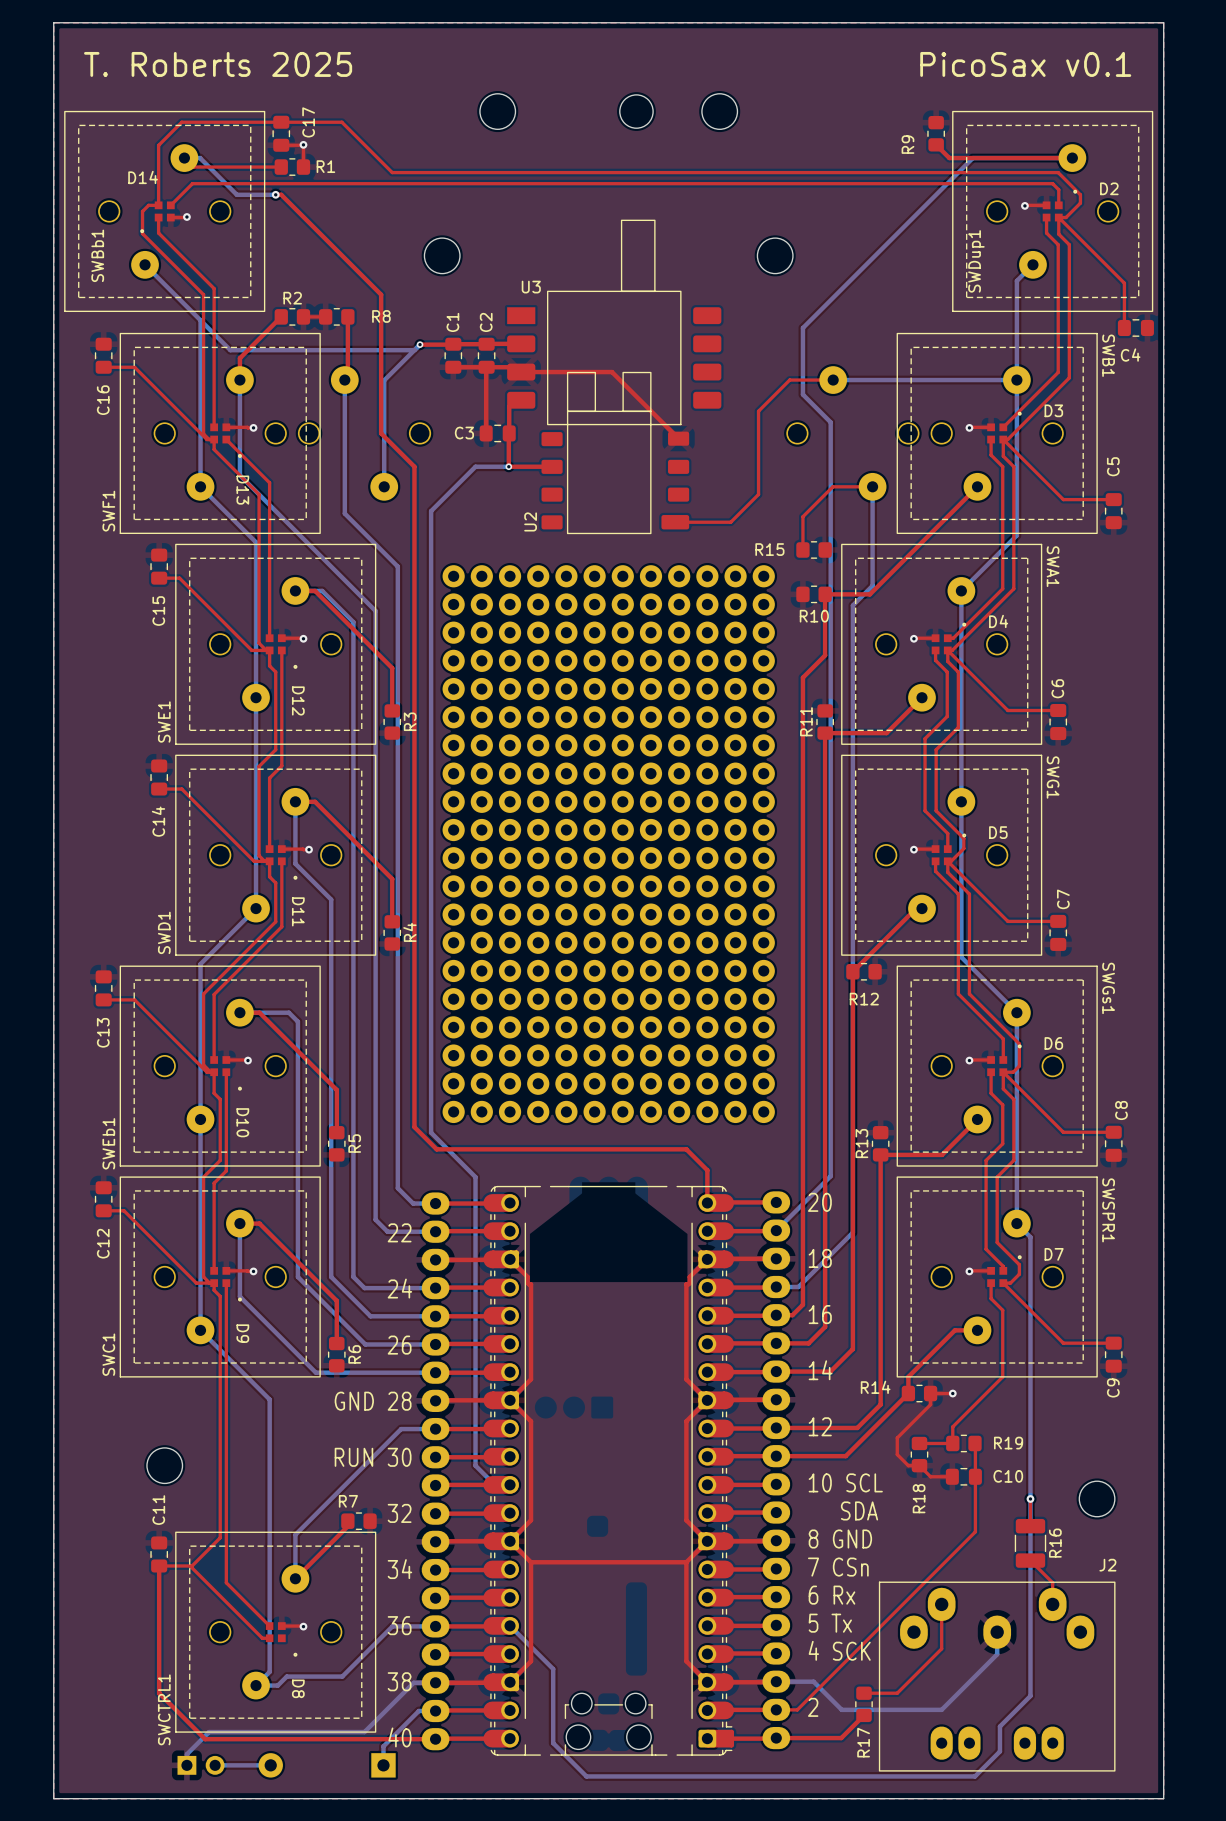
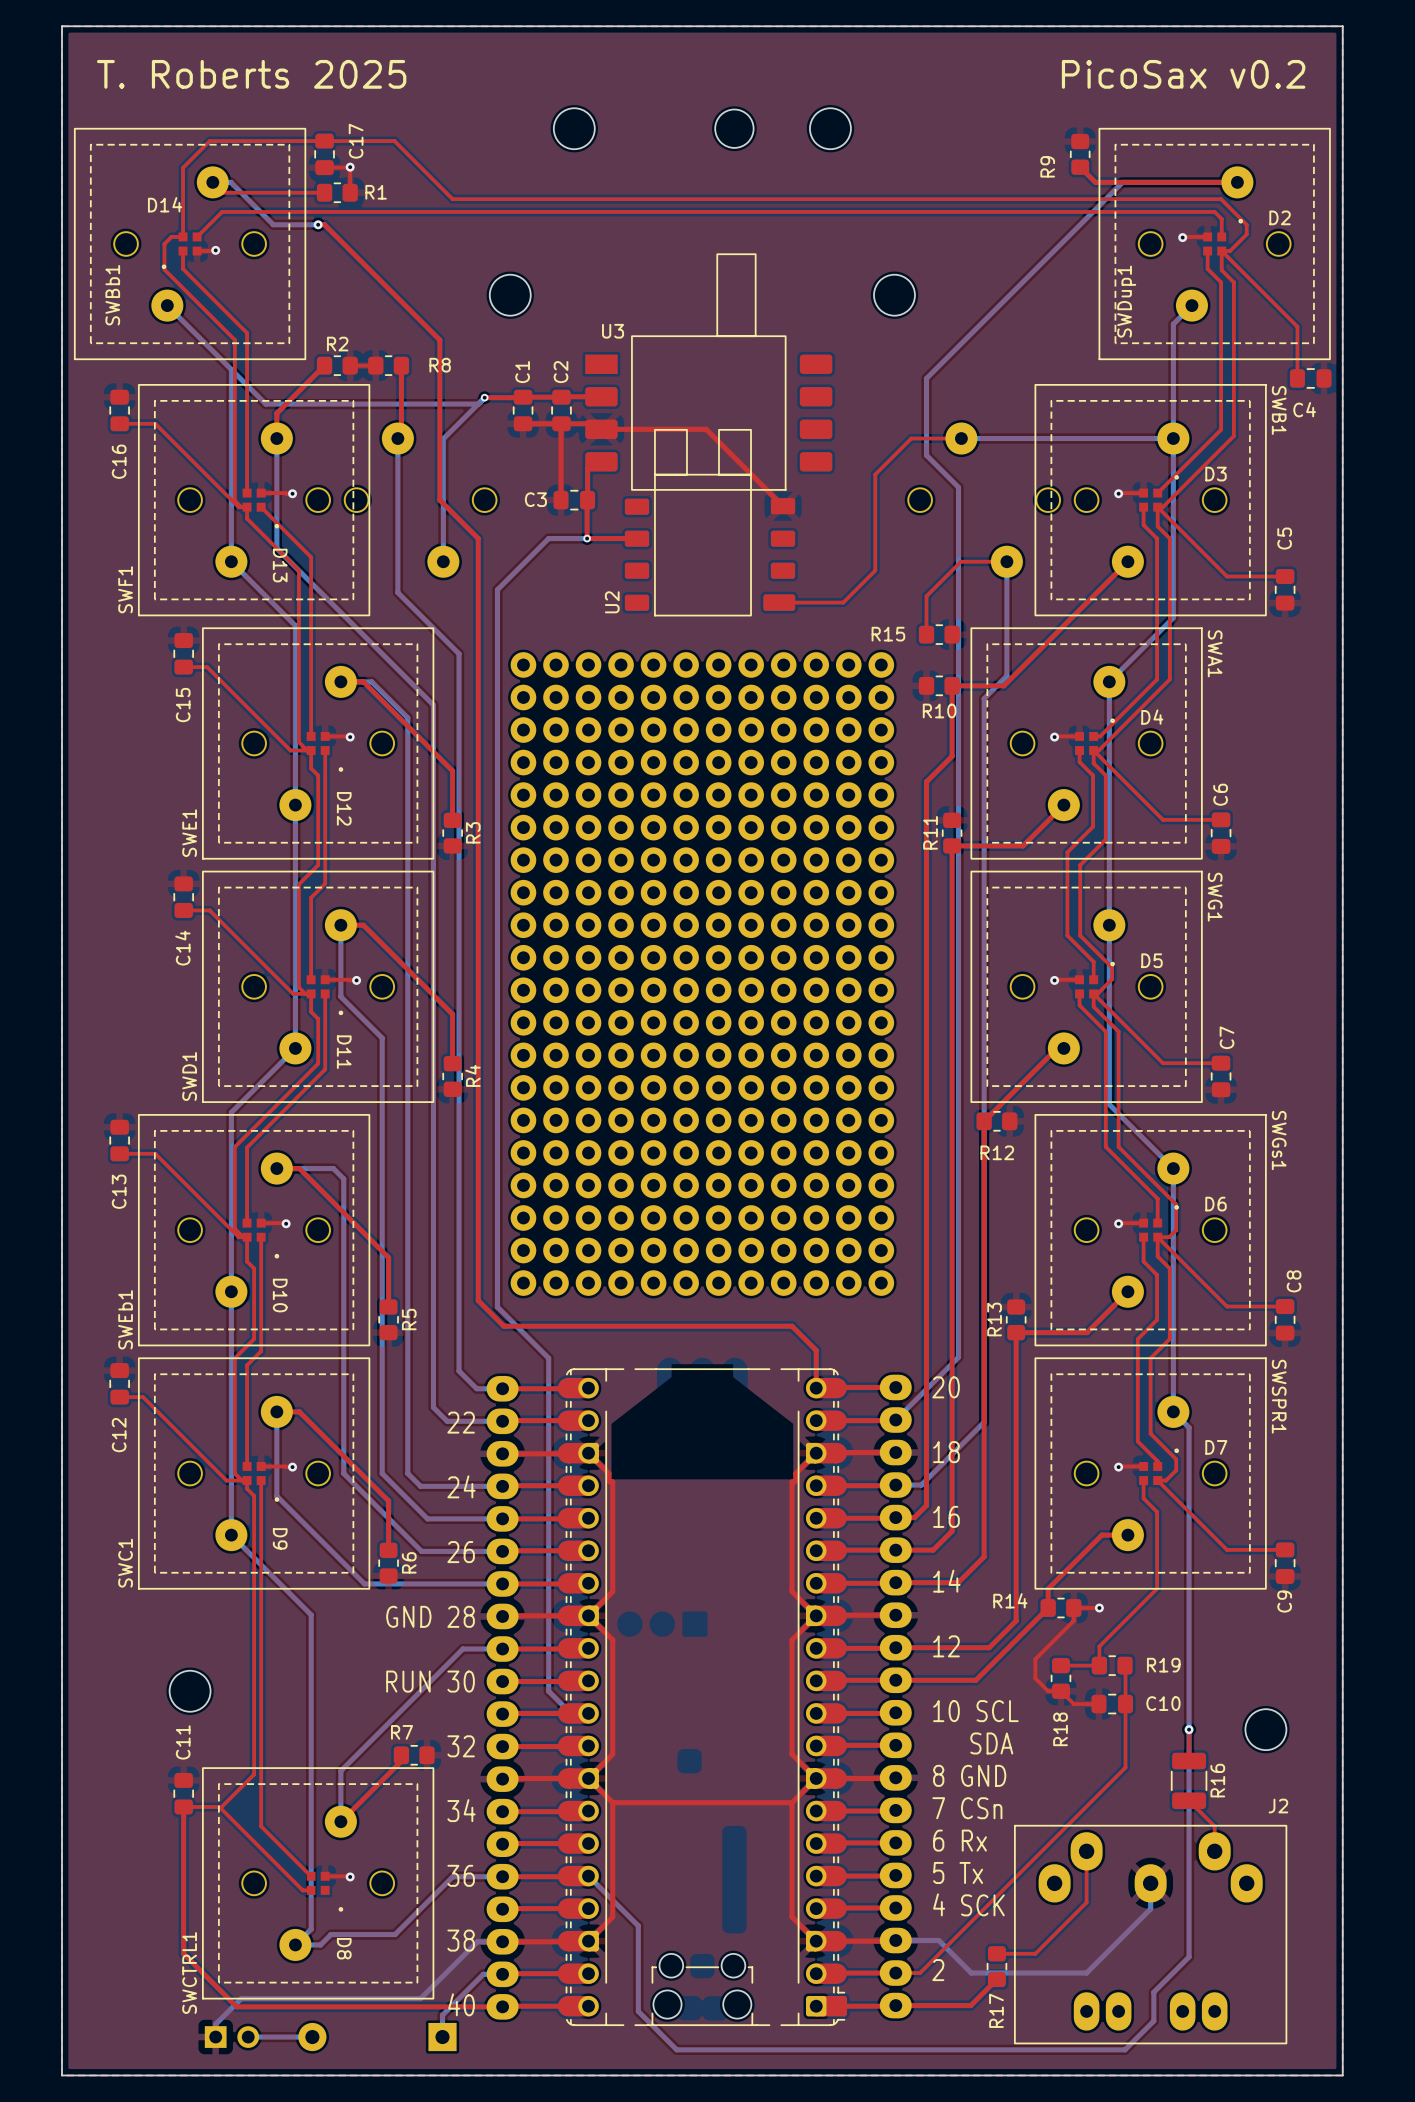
text: PicoSax v0.1 (1025, 64) -> PicoSax v0.2 (1183, 74)

